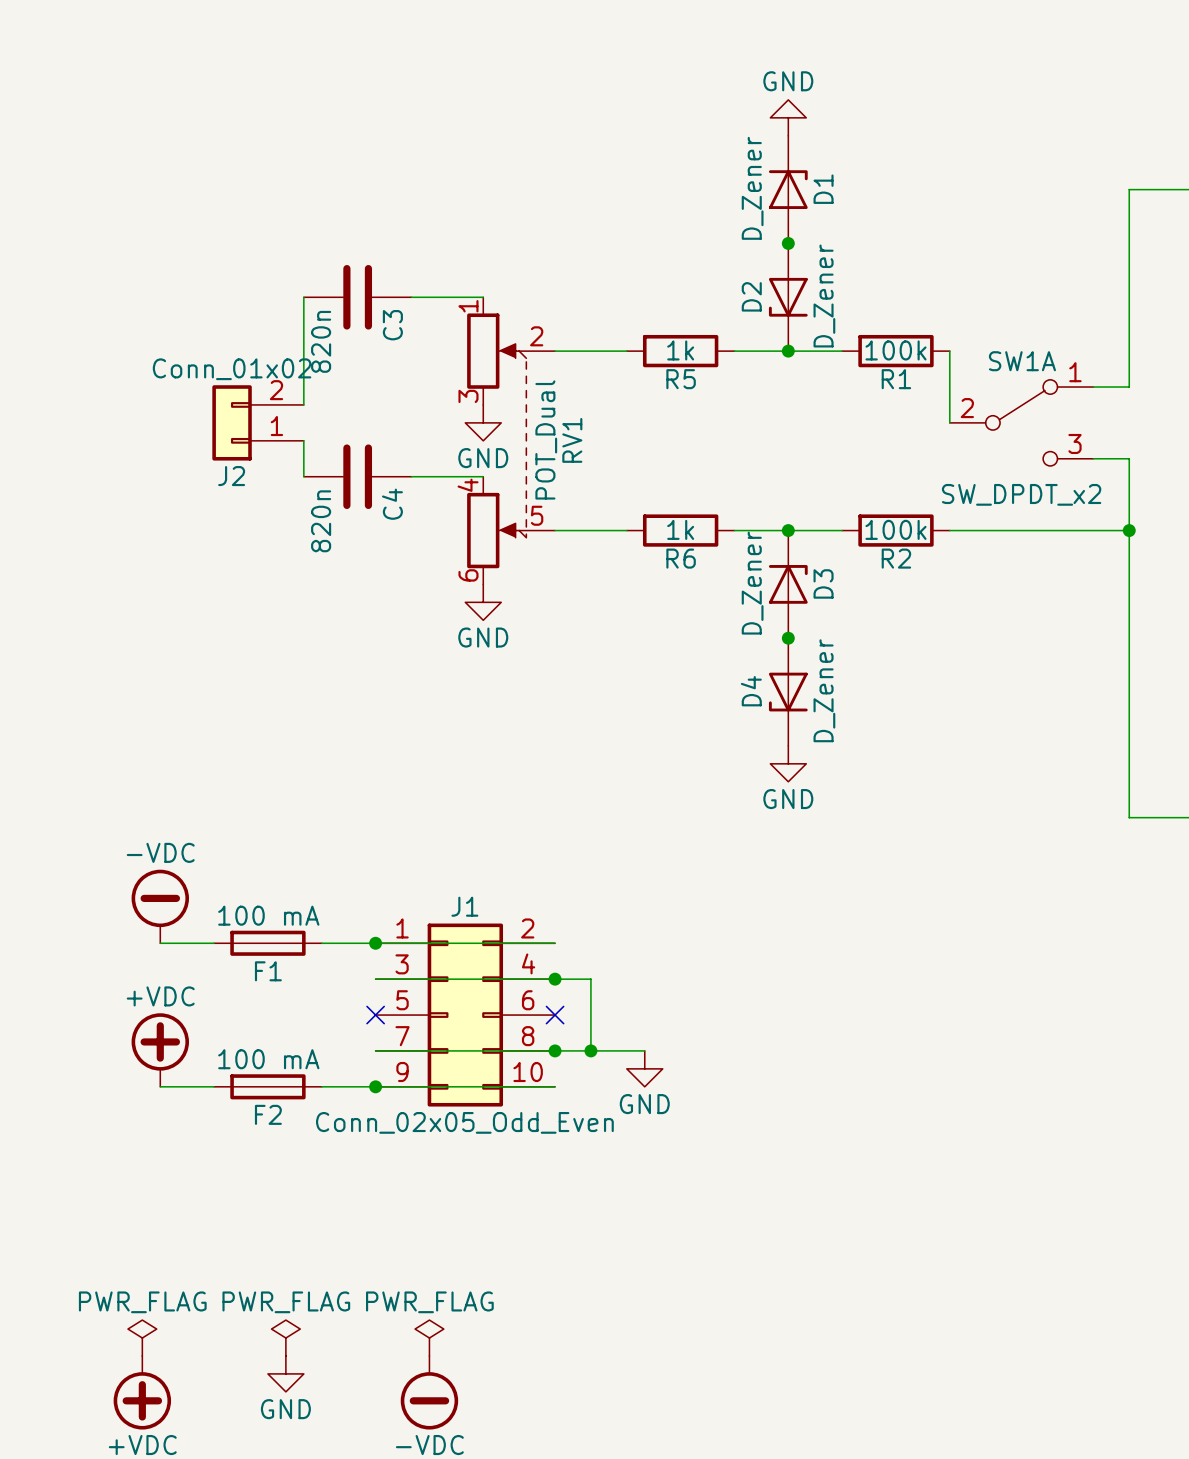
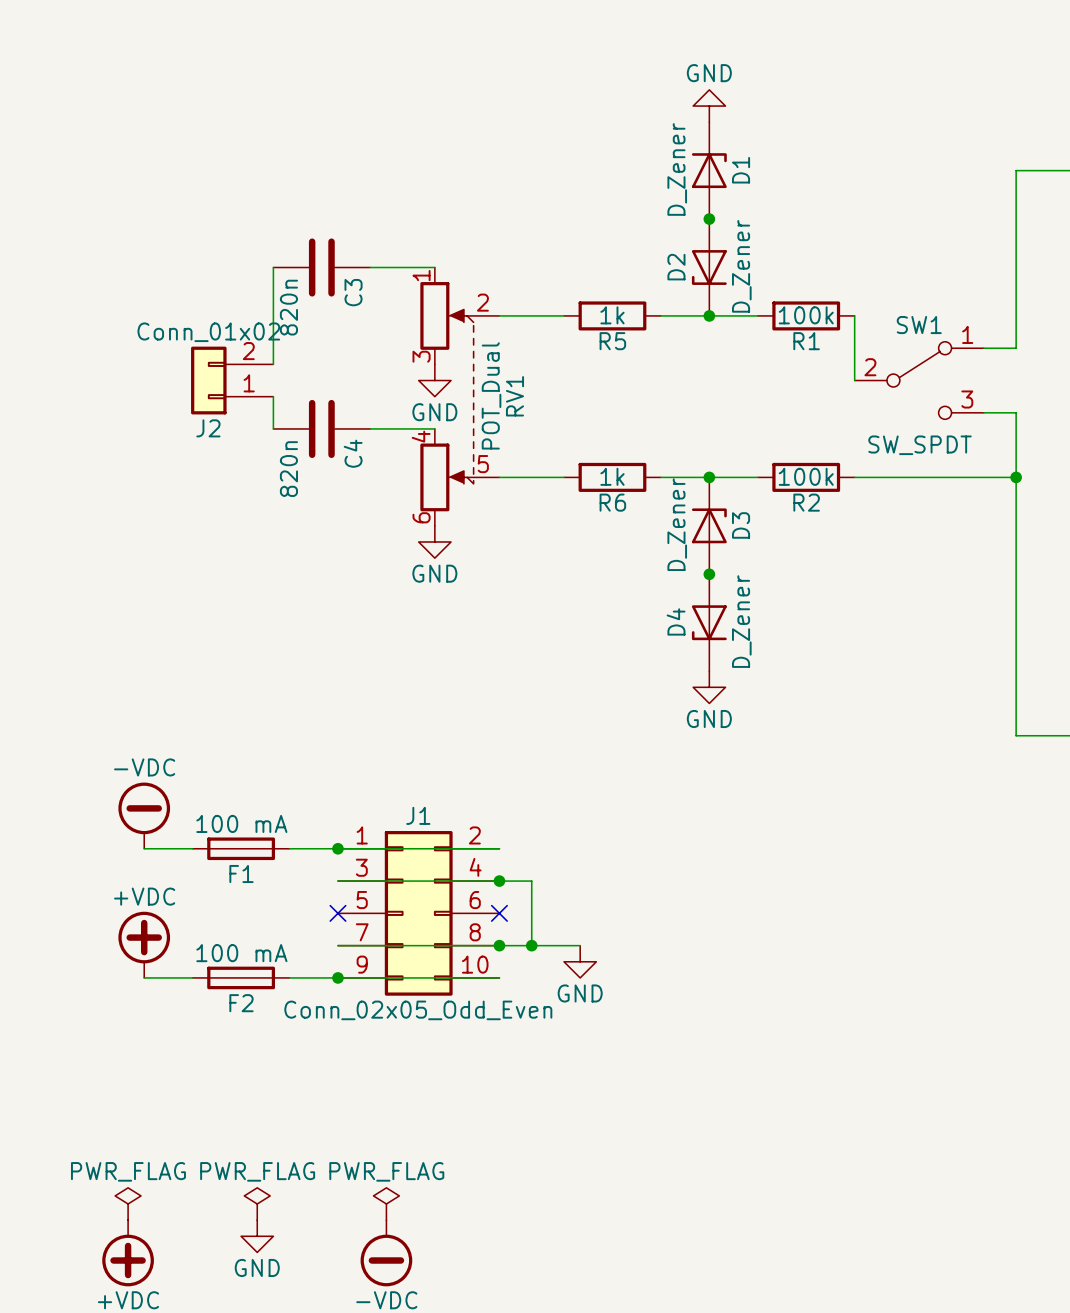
SW1A name: SW1A (1022, 361) -> SW1 (919, 325)
SW1A value: SW_DPDT_x2 (1021, 494) -> SW_SPDT (920, 445)

